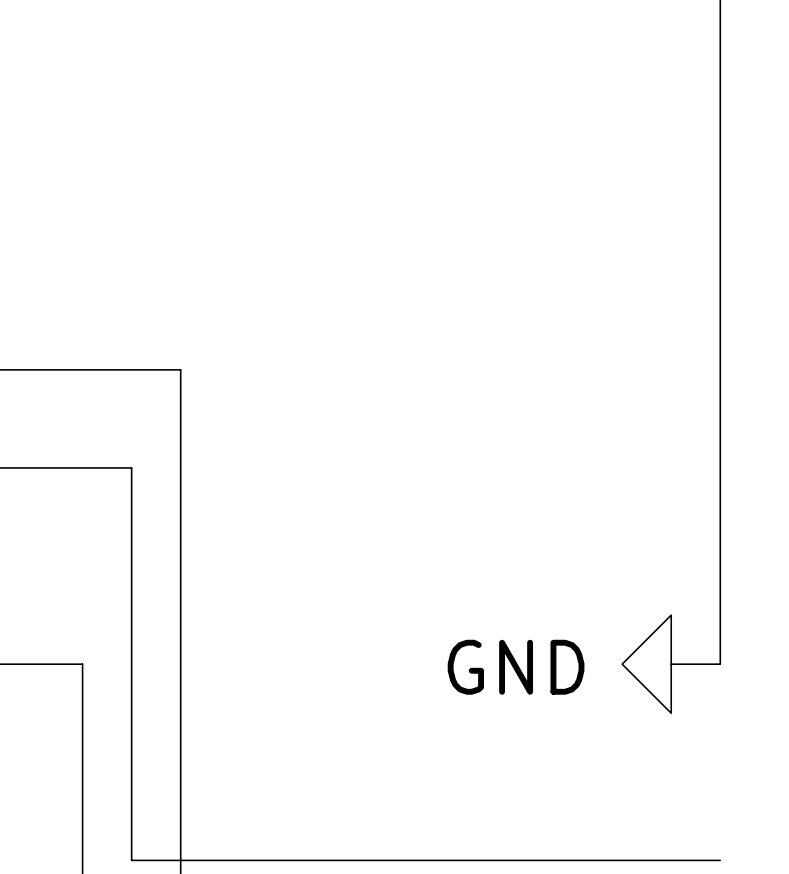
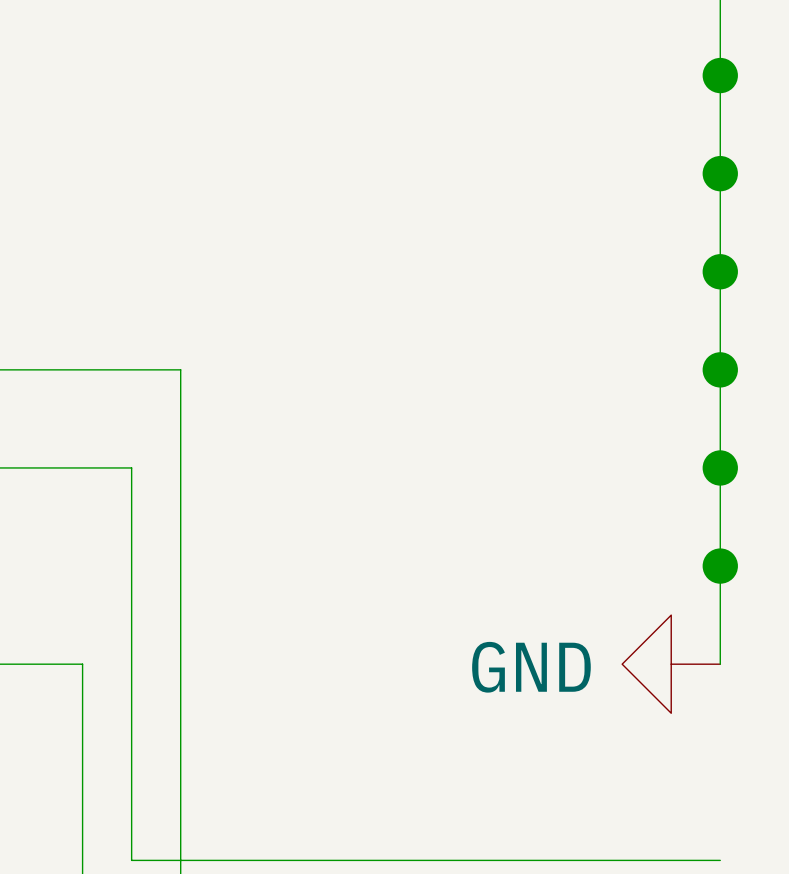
junction: none -> (720, 75)
junction: none -> (720, 173)
junction: none -> (720, 271)
junction: none -> (720, 369)
junction: none -> (720, 467)
junction: none -> (720, 566)

